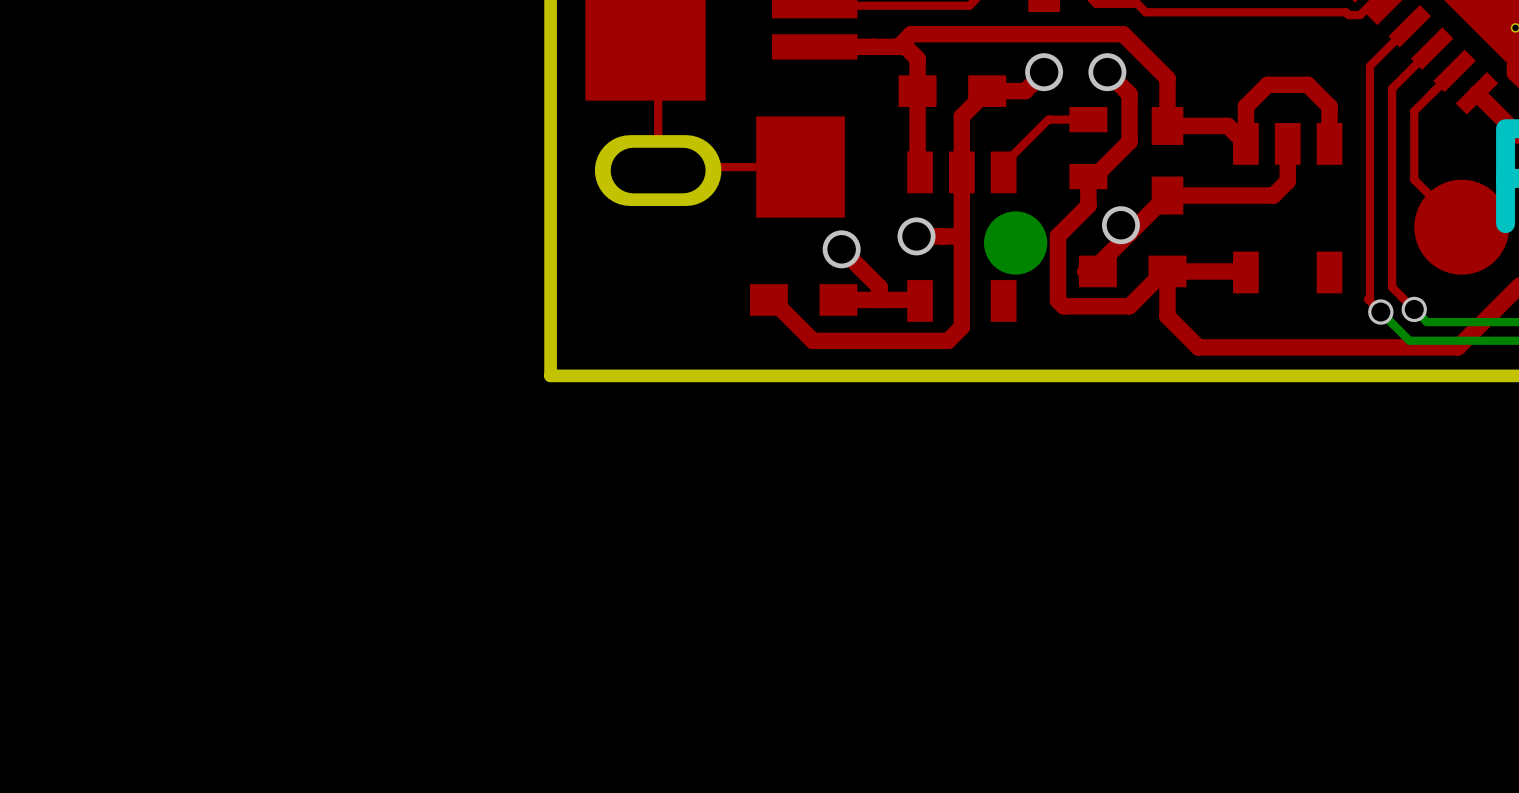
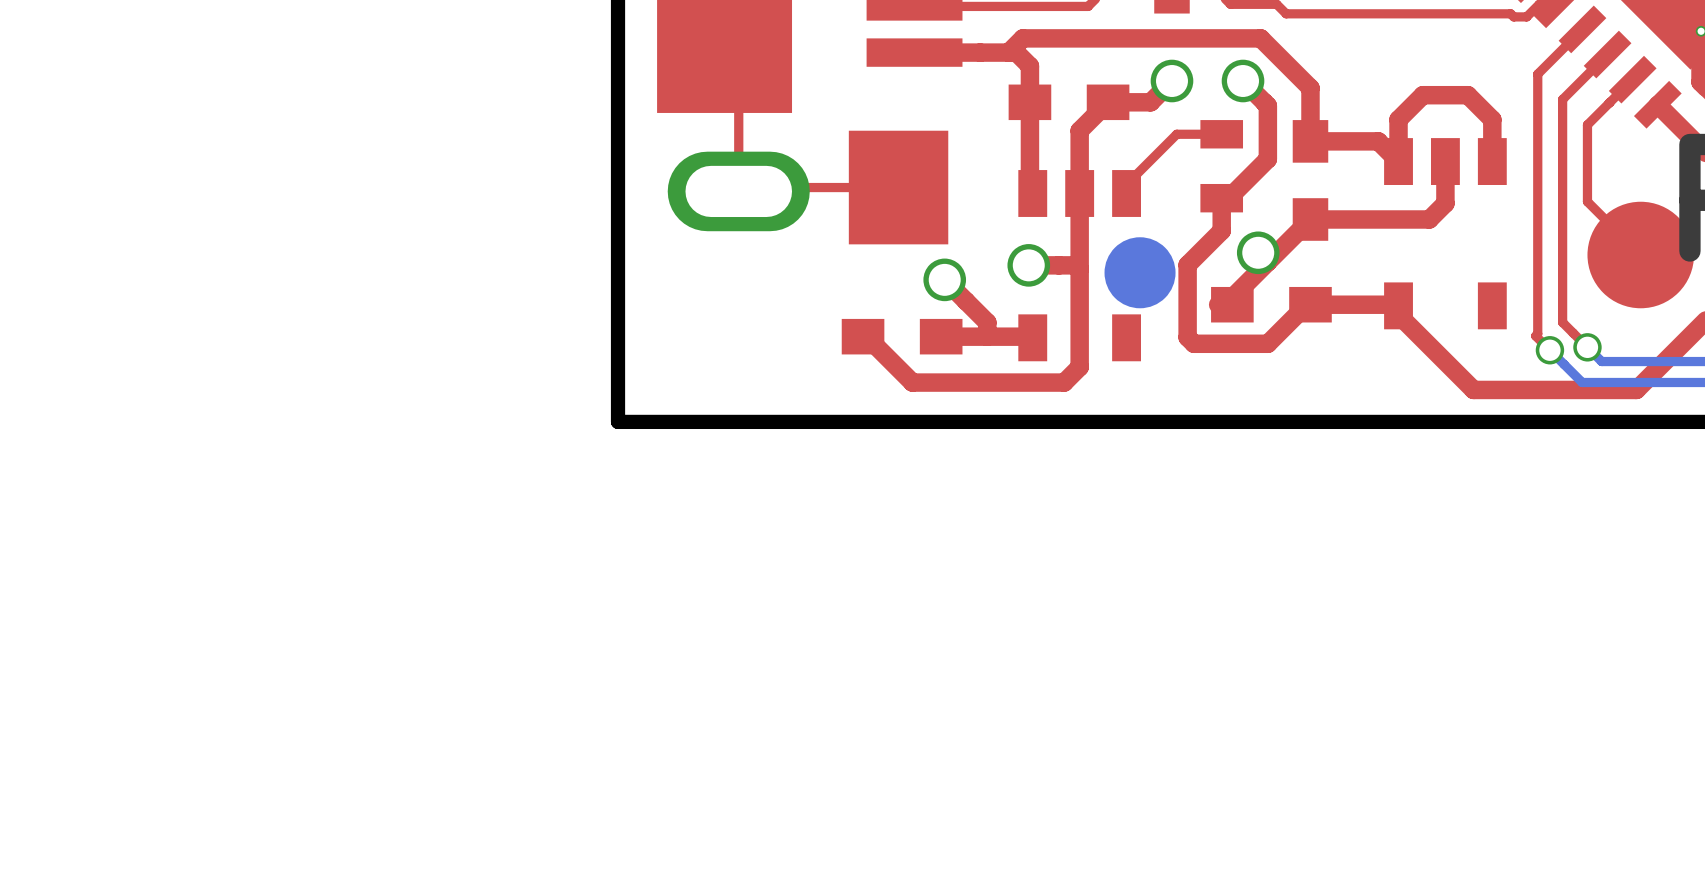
top track: (1167, 271) (1167, 316) (1198, 347) (1312, 347) -> (1398, 314) (1473, 389)

